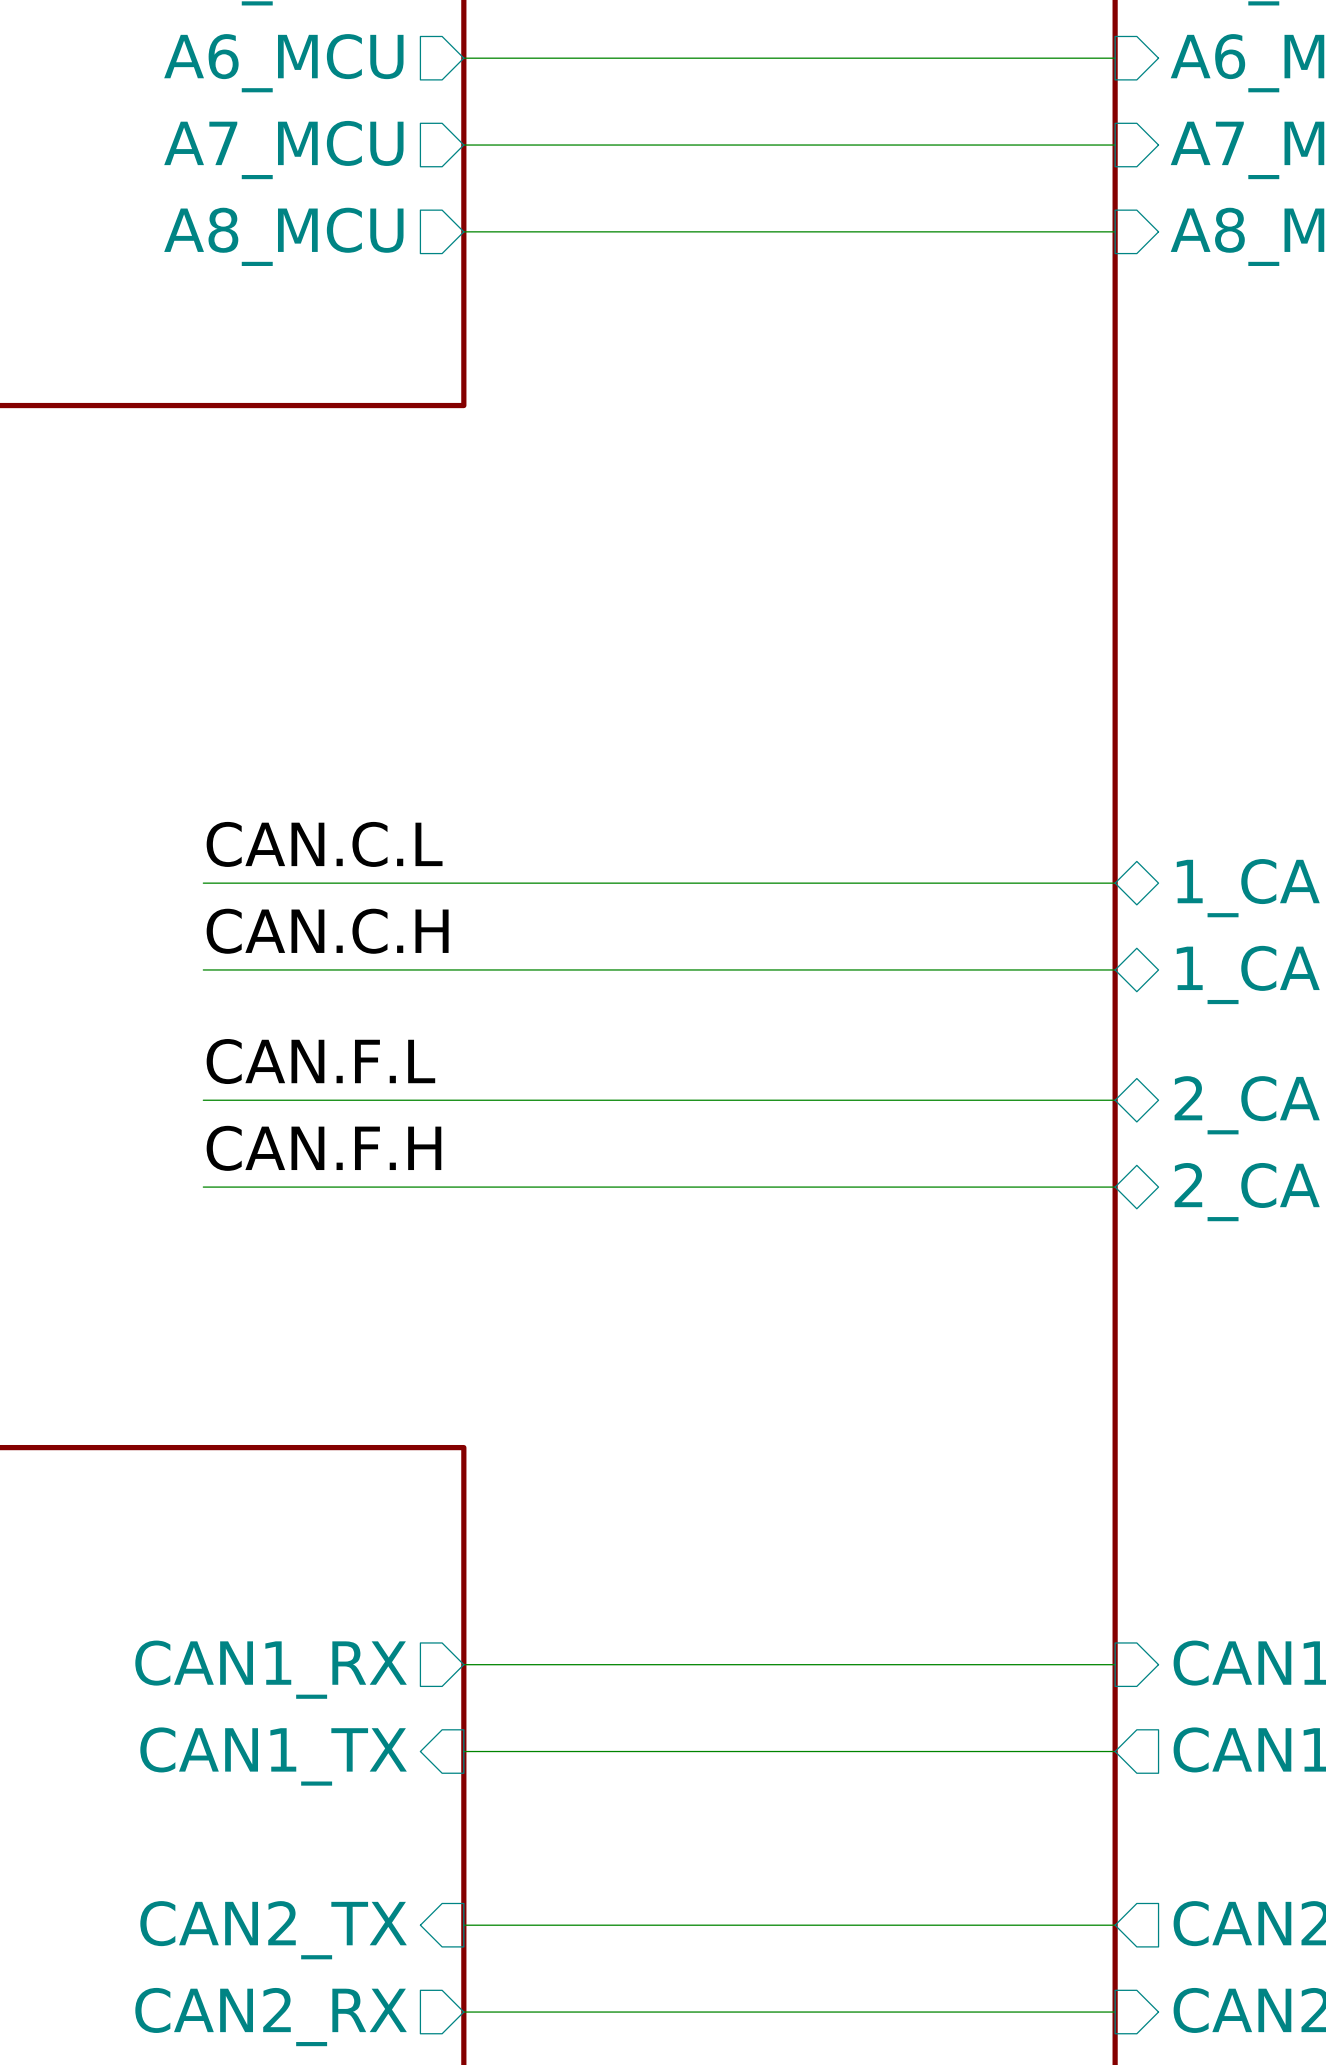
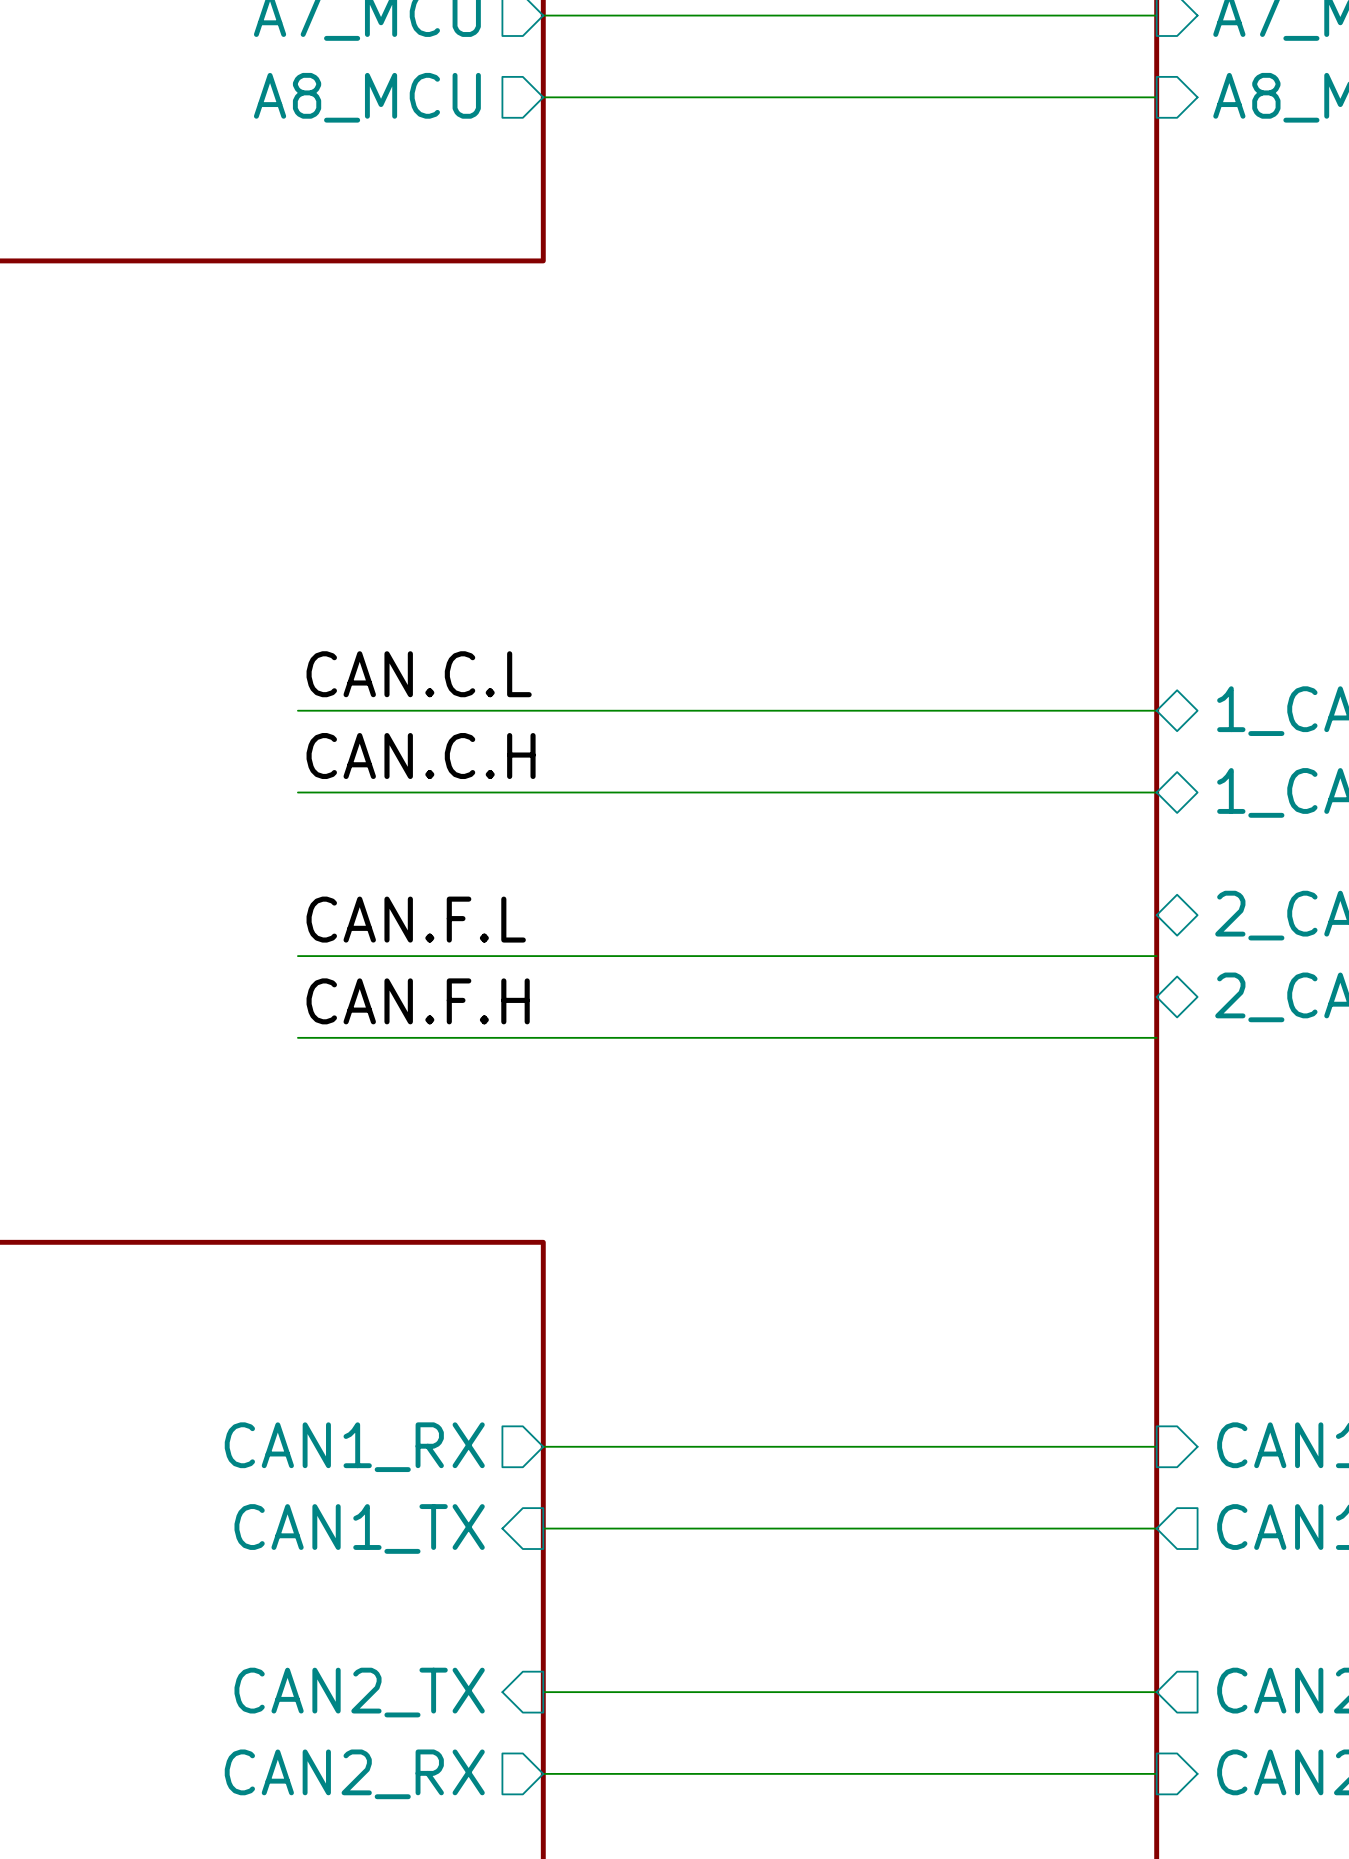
label position: CAN.F.L (320, 1061) -> CAN.F.L (416, 919)
wire: (203, 1100) (1115, 1100) -> (297, 956) (1156, 956)
label position: CAN.F.H (323, 1148) -> CAN.F.H (418, 1001)
wire: (203, 1187) (1115, 1187) -> (297, 1037) (1156, 1037)

